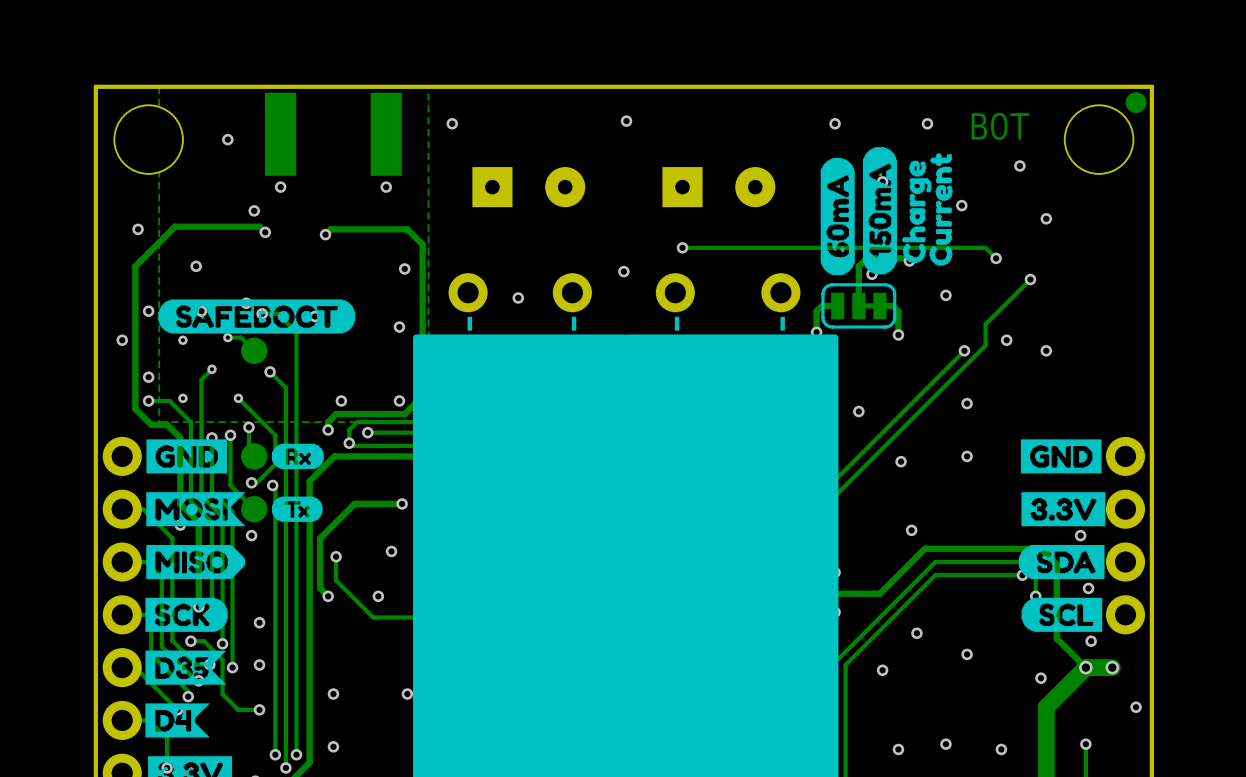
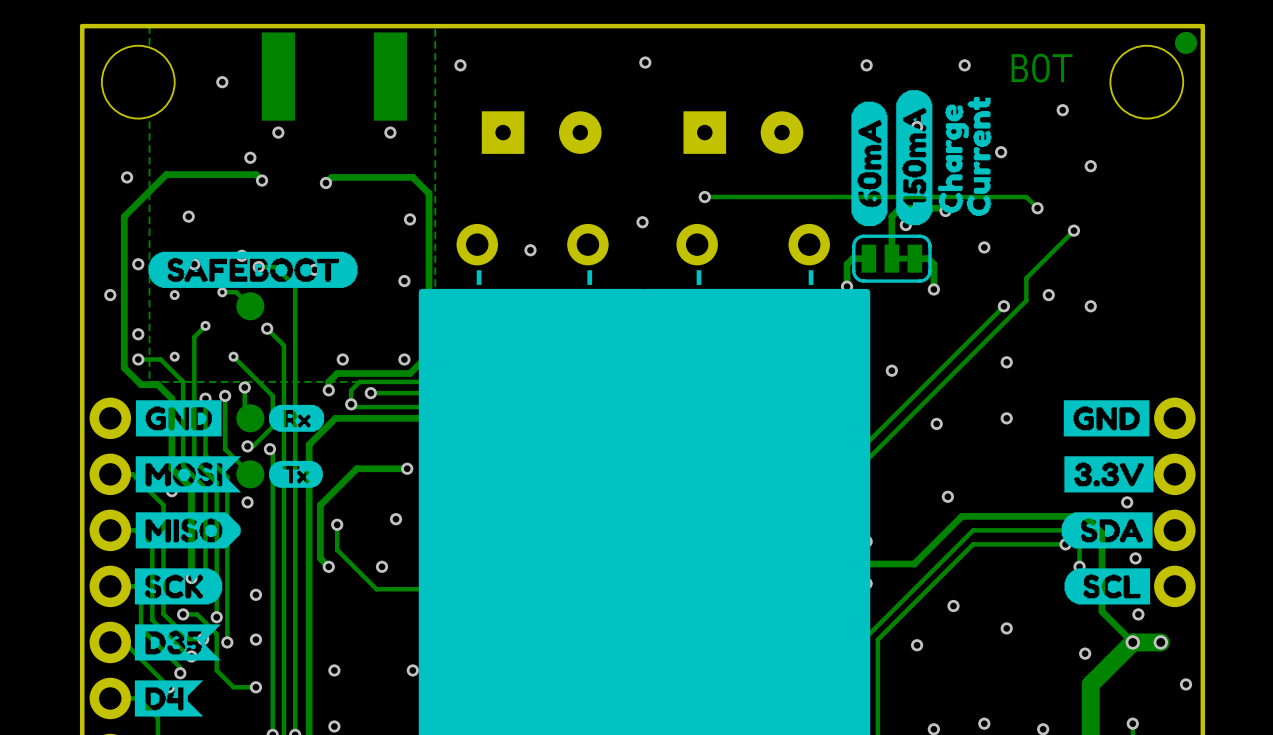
part footprint: [821, 283, 897, 329] -> [852, 234, 932, 283]

